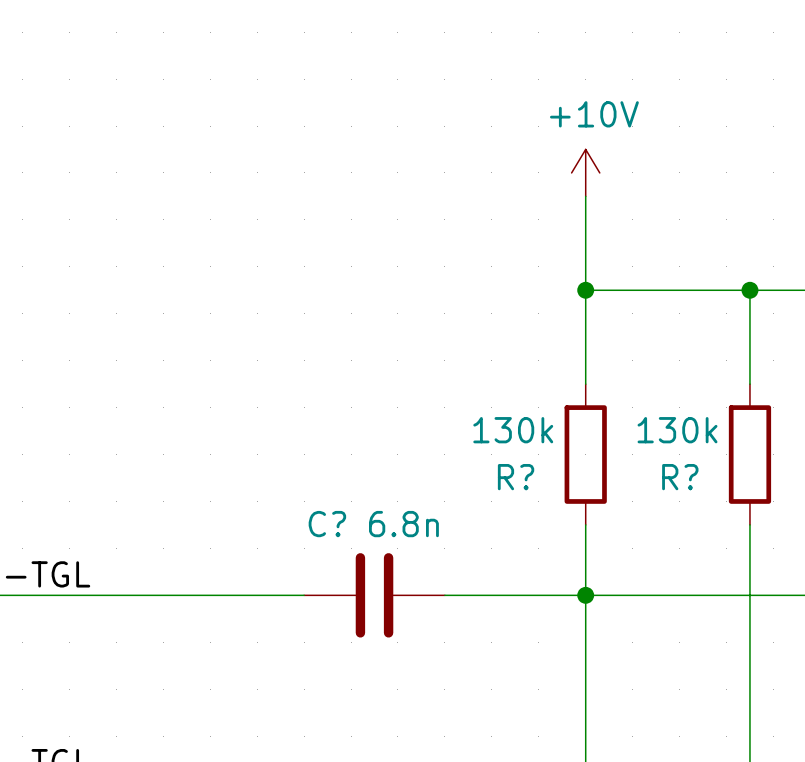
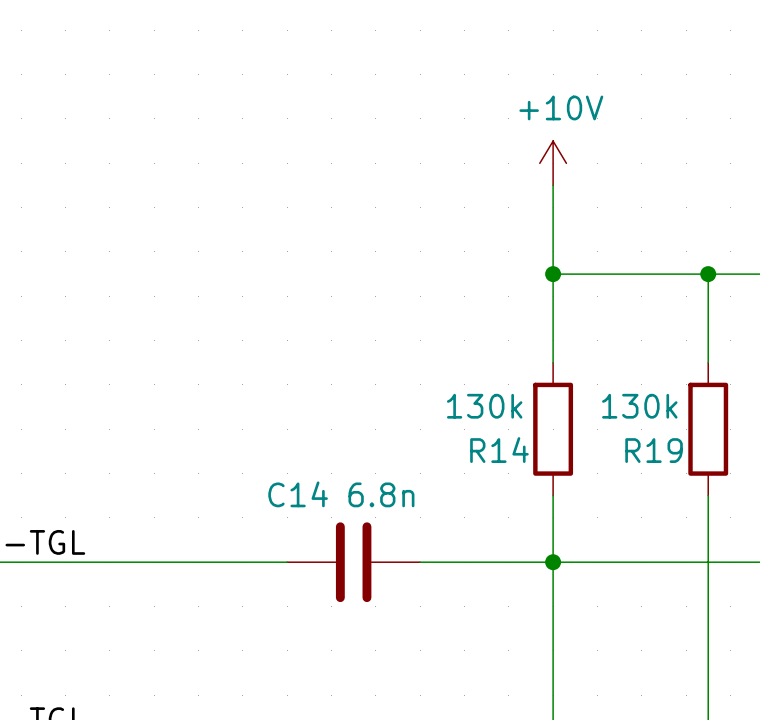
R? name: R? (516, 477) -> R14 (499, 450)
R? name: R? (680, 477) -> R19 (654, 450)
C? name: C? (327, 524) -> C14 (298, 494)

